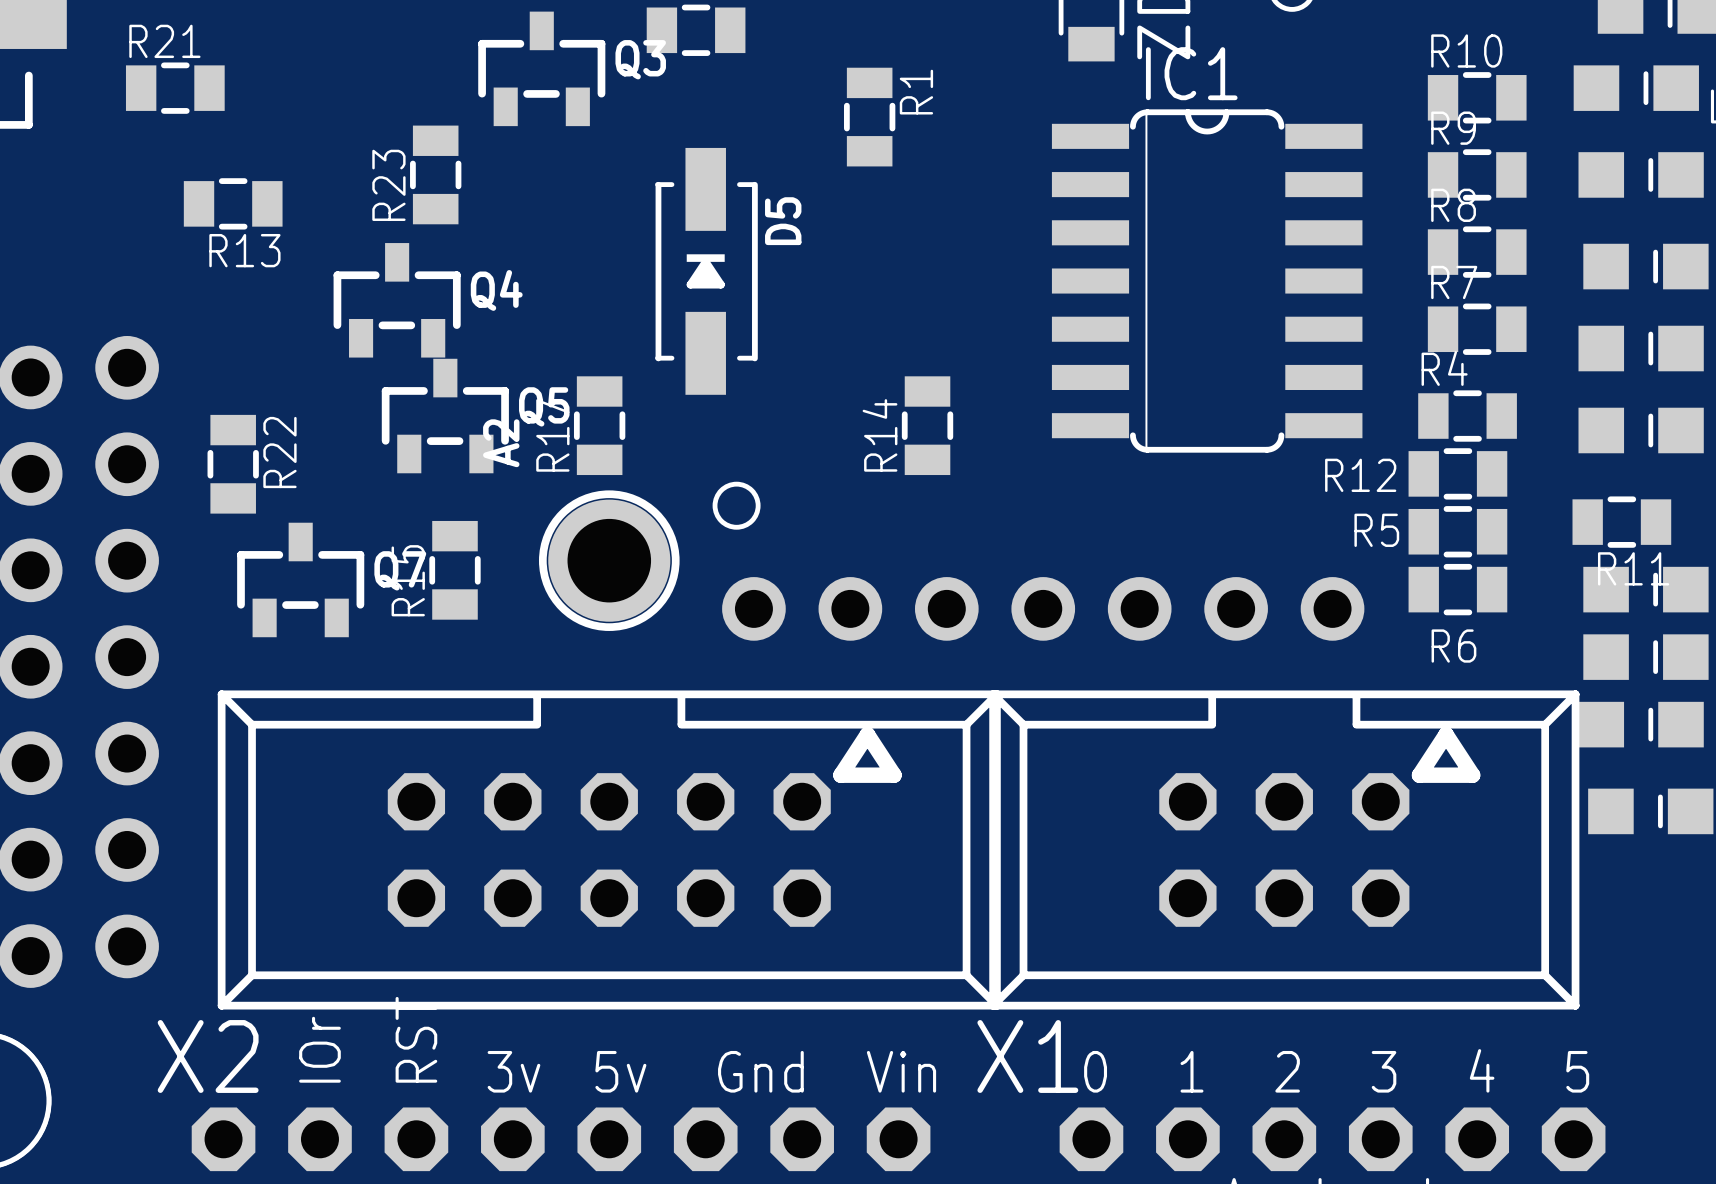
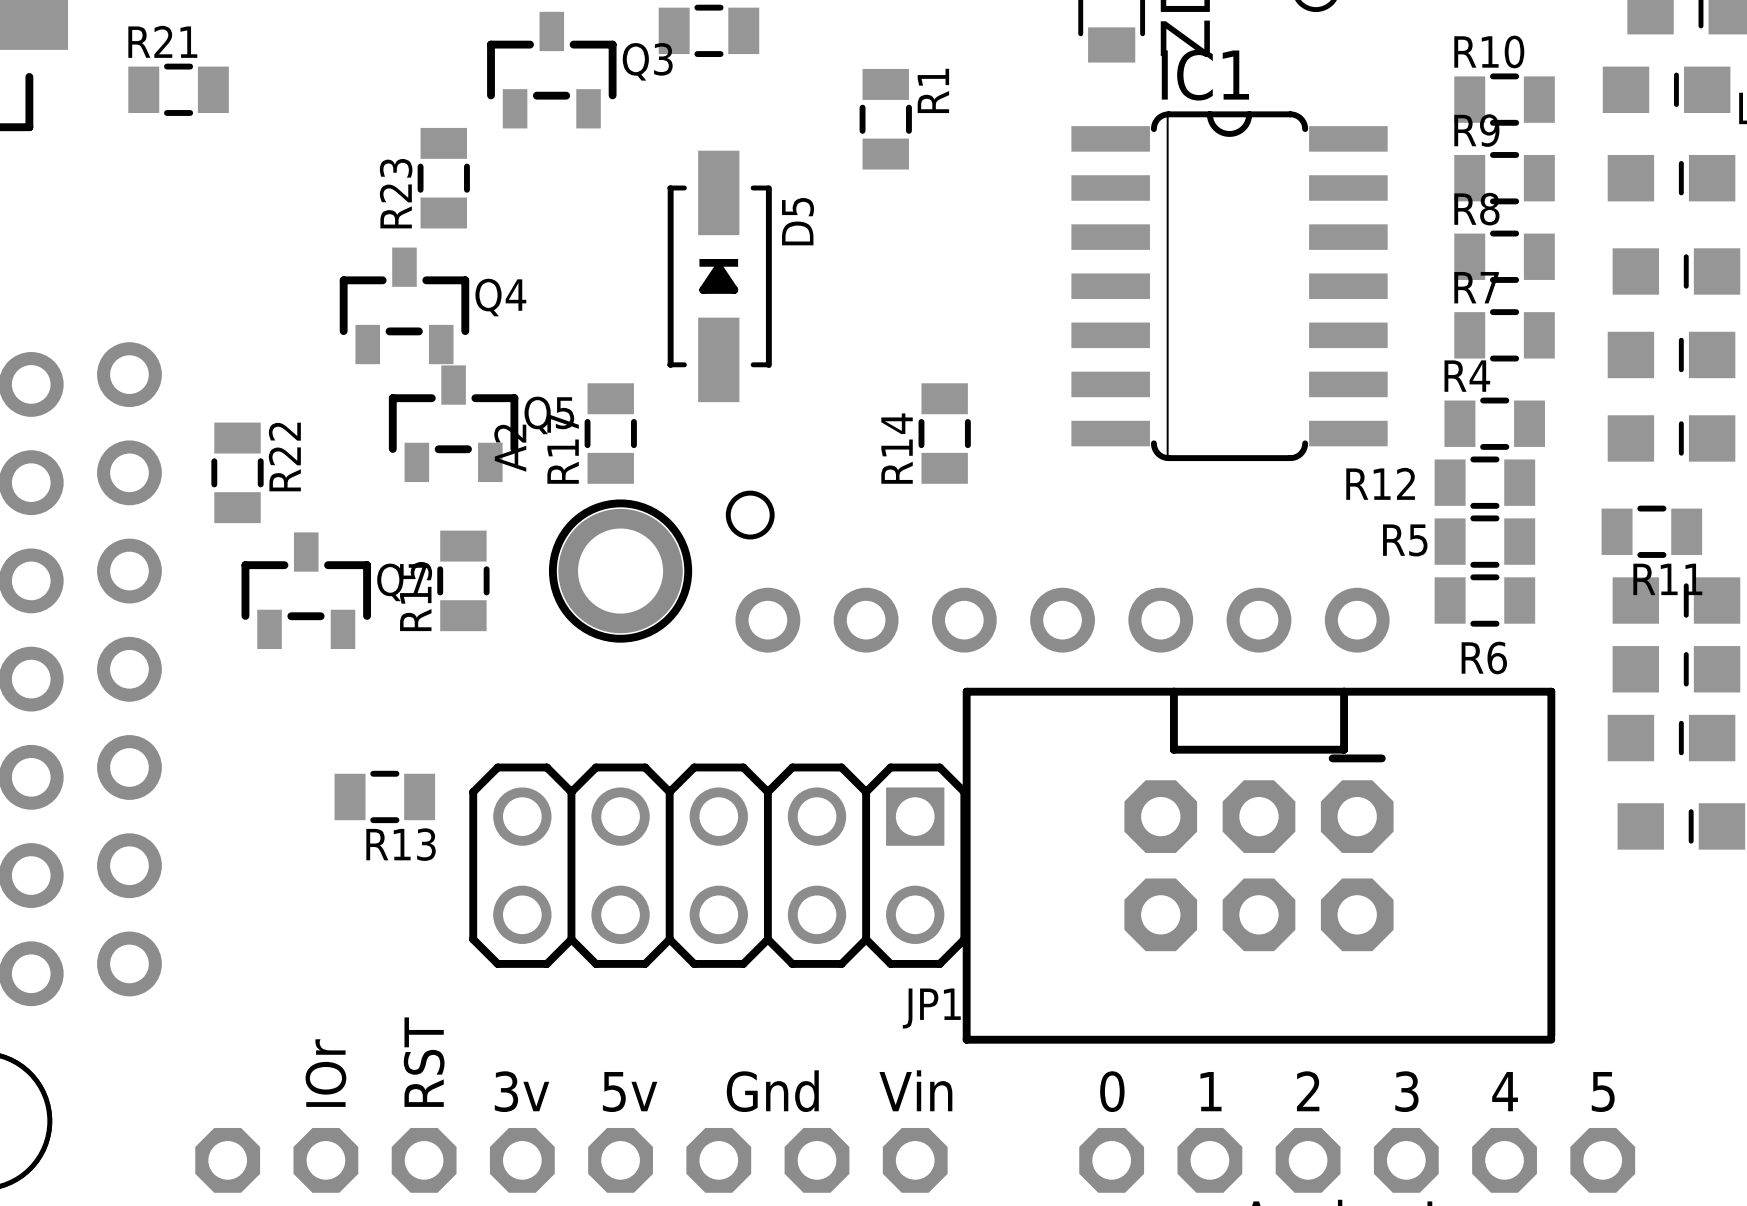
R13 position: (233, 203) -> (384, 796)
X2: (609, 849) -> none
JP1: none -> (718, 865)
part: none -> (1258, 865)
X1: (1284, 849) -> none

